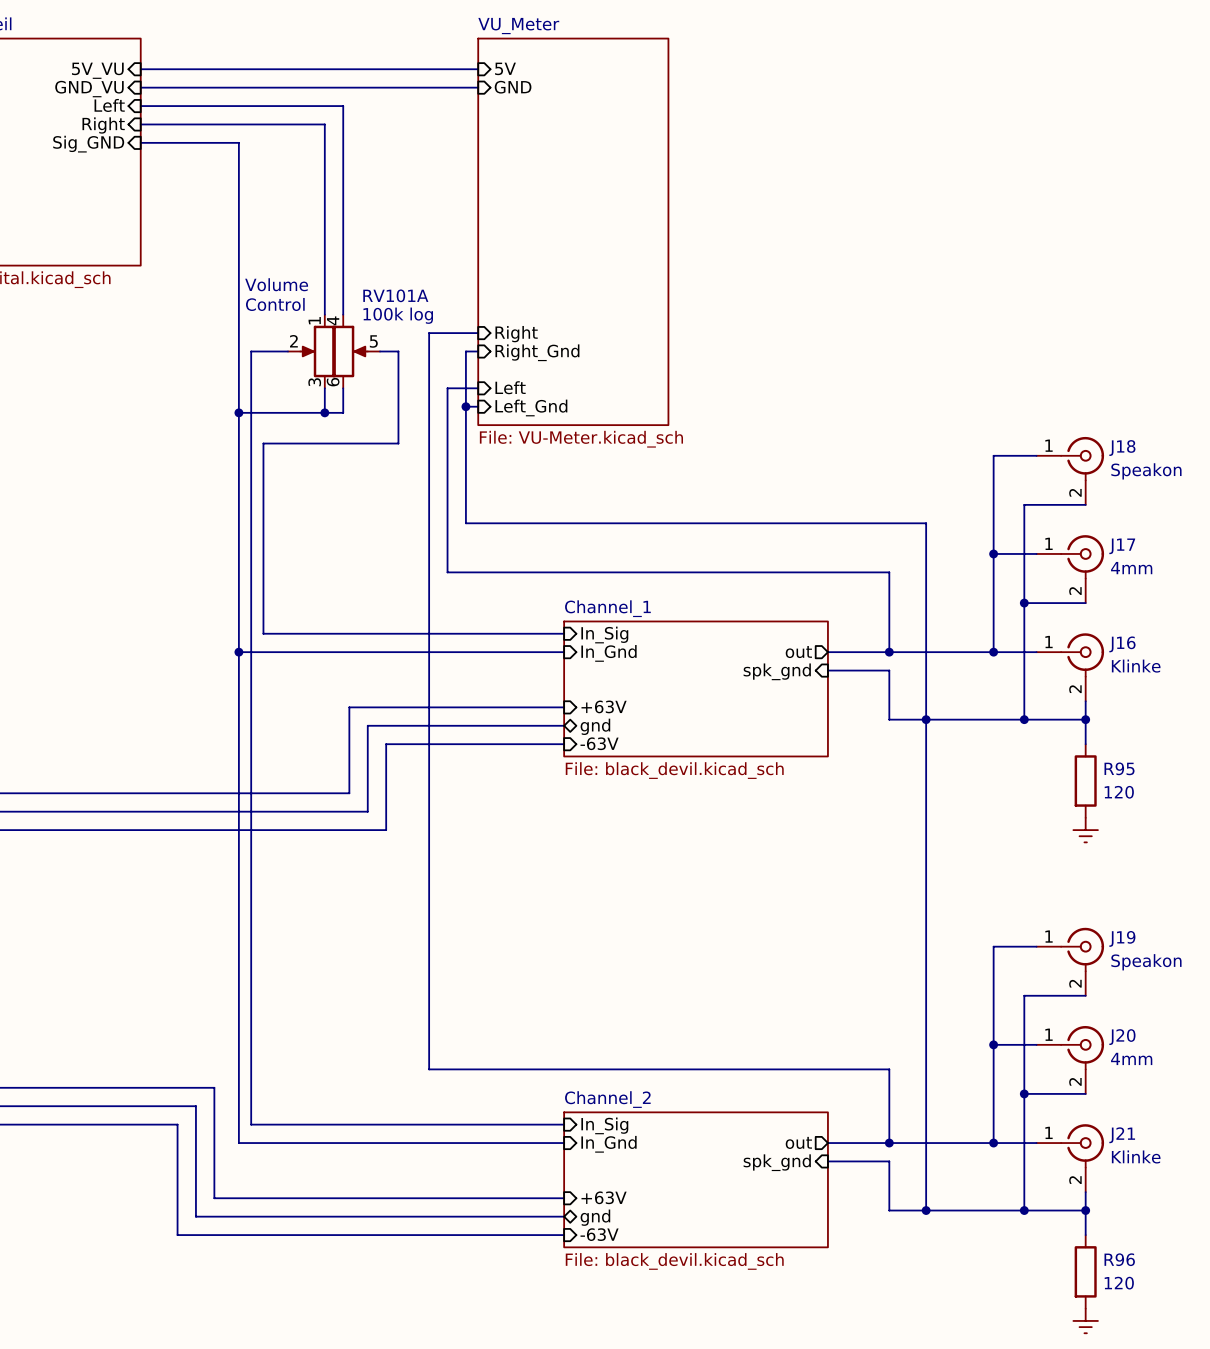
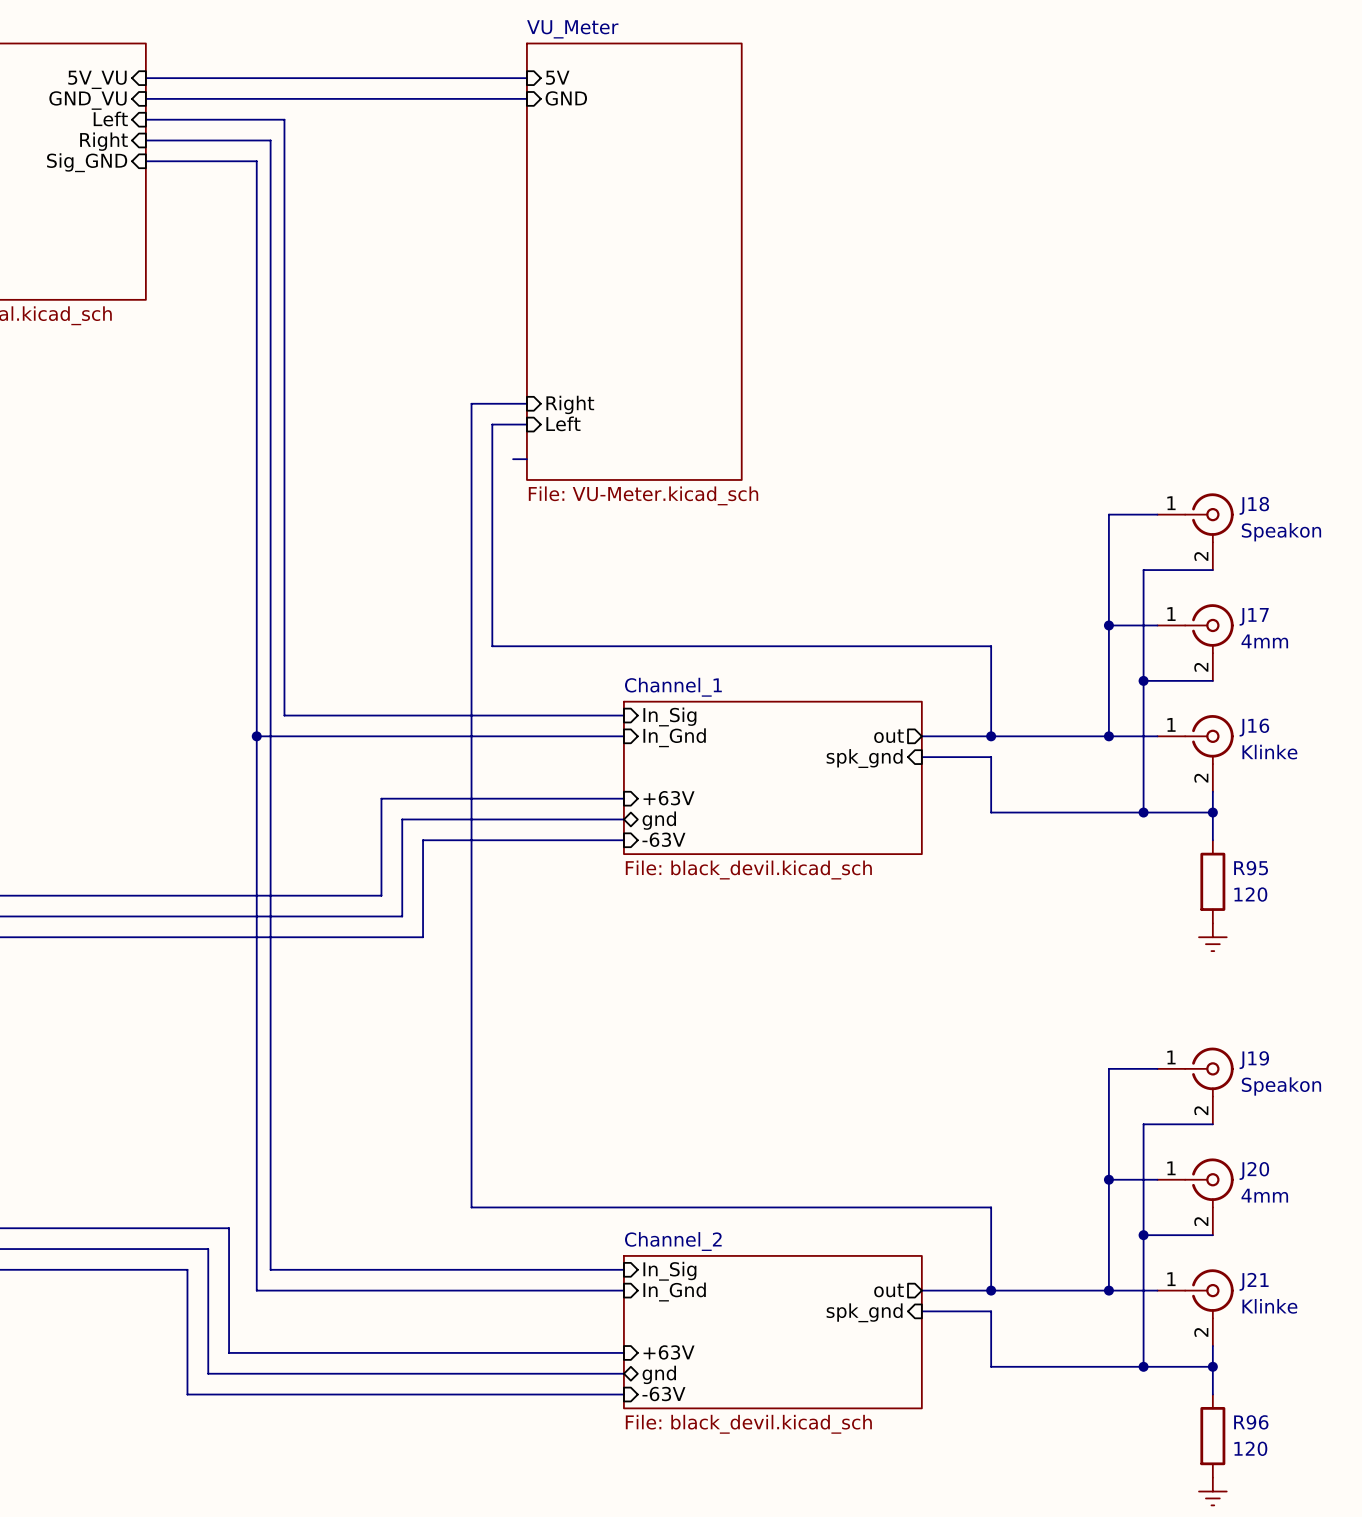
wire: (263, 106) (343, 106) (343, 314) -> (284, 119) (284, 500)
wire: (251, 124) (324, 124) (324, 314) -> (270, 140) (270, 396)
text: Volume (276, 284) -> none
text: Control (275, 304) -> none
wire: (478, 333) (429, 333) (429, 357) -> (526, 403) (471, 403)
sheet pin position: Right (516, 334) -> Right (570, 404)
wire: (251, 351) (288, 351) -> none
RV101A: (311, 351) -> none
part: 100k log (356, 351) -> none
wire: (380, 351) (398, 351) (398, 443) (263, 443) -> none
wire: (478, 351) (465, 351) (465, 523) (926, 523) (926, 1210) -> none
sheet pin: Right_Gnd (537, 352) -> none
sheet pin position: Left (510, 387) -> Left (563, 423)
wire: (324, 388) (324, 412) -> none
wire: (343, 388) (343, 412) (238, 412) -> none
wire: (447, 388) (478, 388) -> (492, 438) (492, 424) (526, 424)
junction: (465, 406) -> none
sheet pin: Left_Gnd (531, 407) -> none
junction: (238, 412) -> none
junction: (324, 412) -> none
junction: (926, 719) -> none
junction: (926, 1210) -> none

